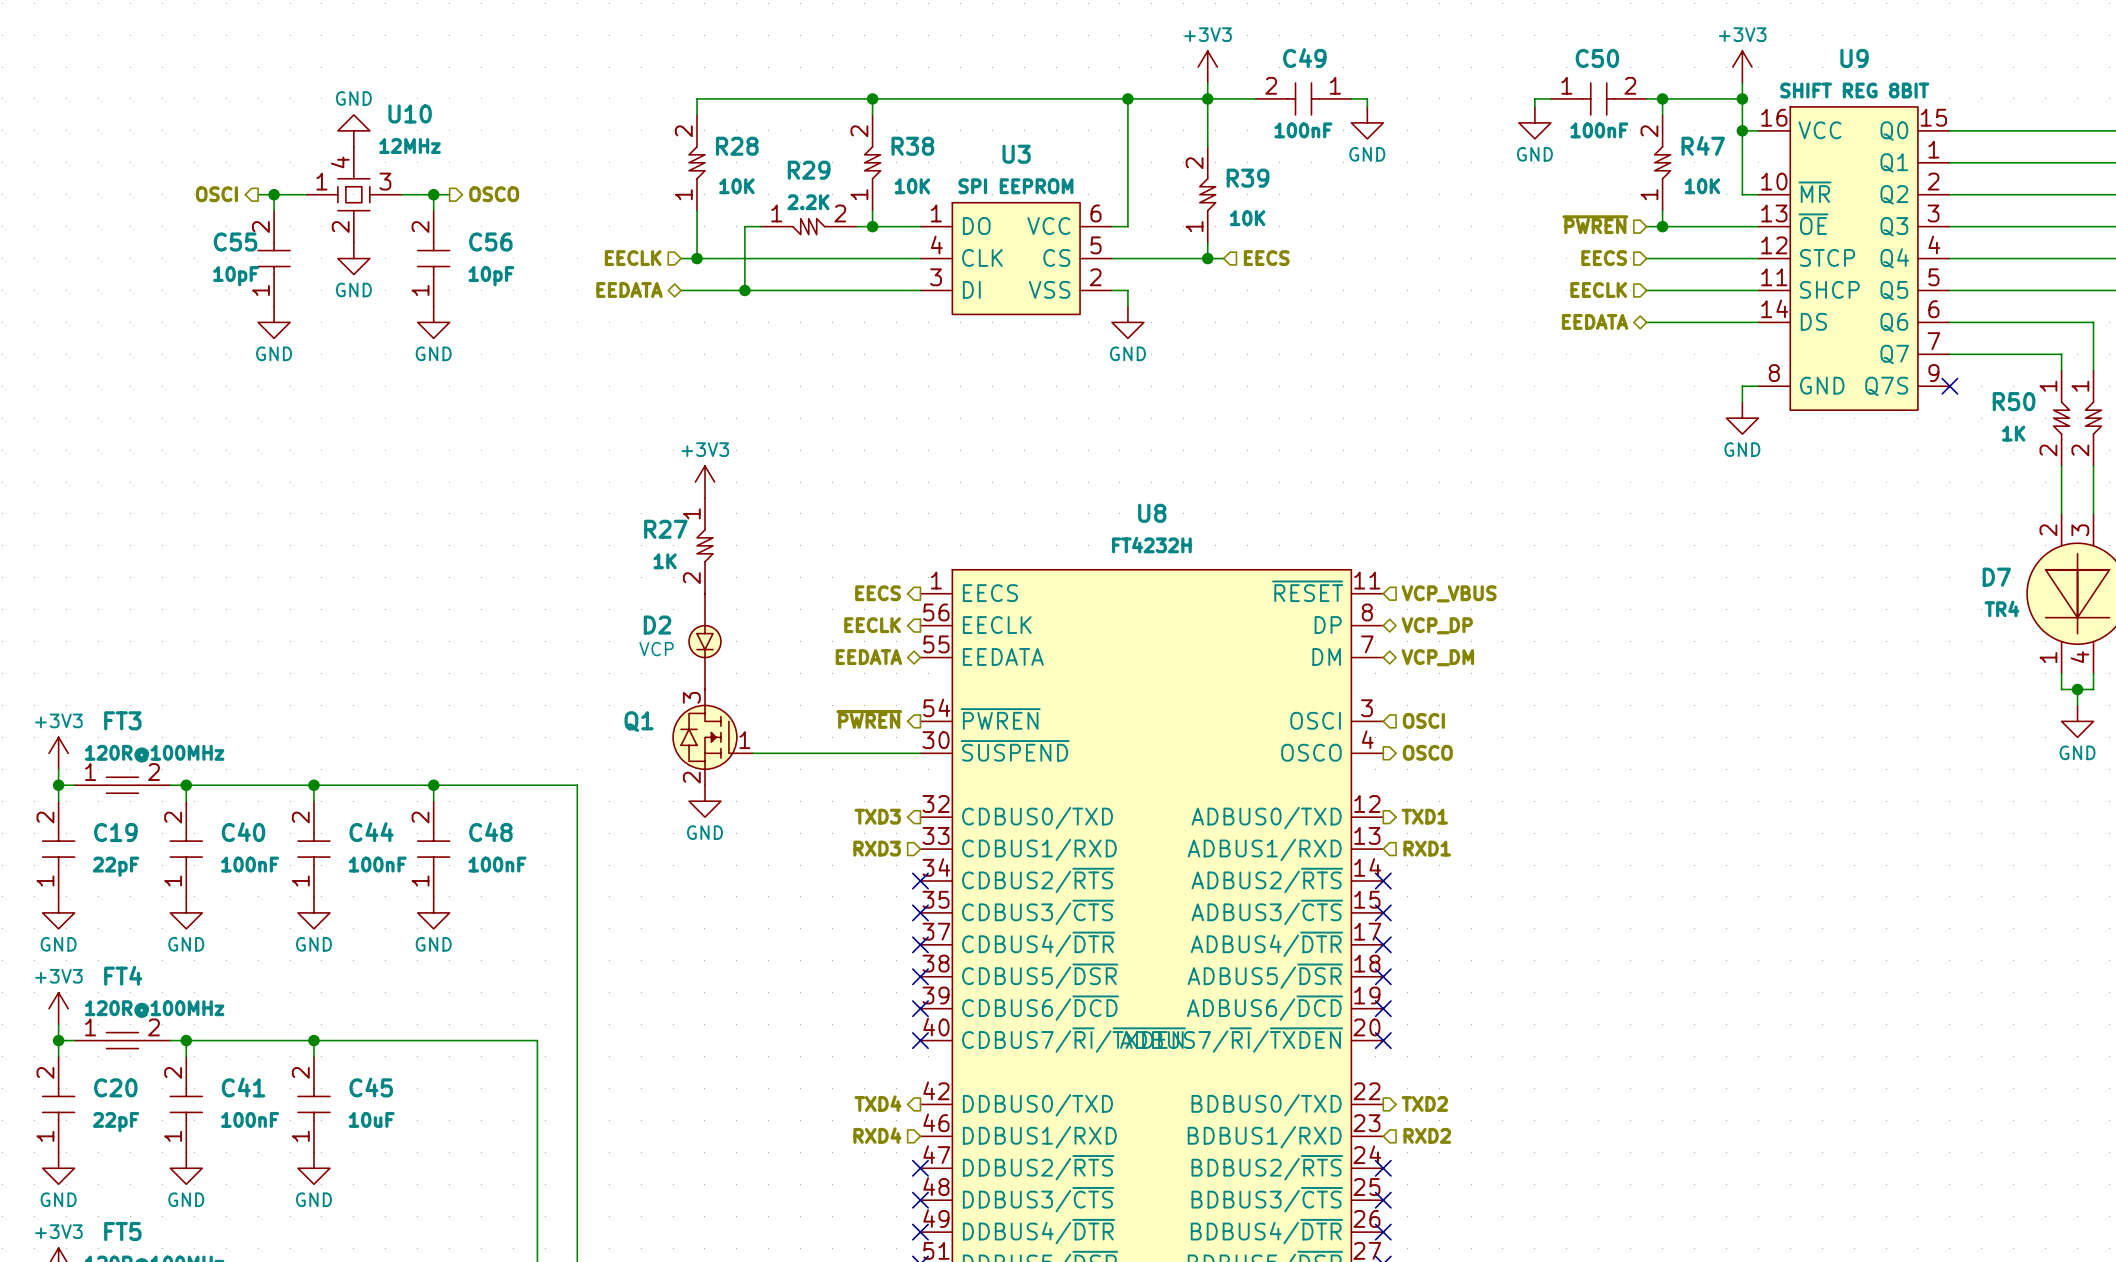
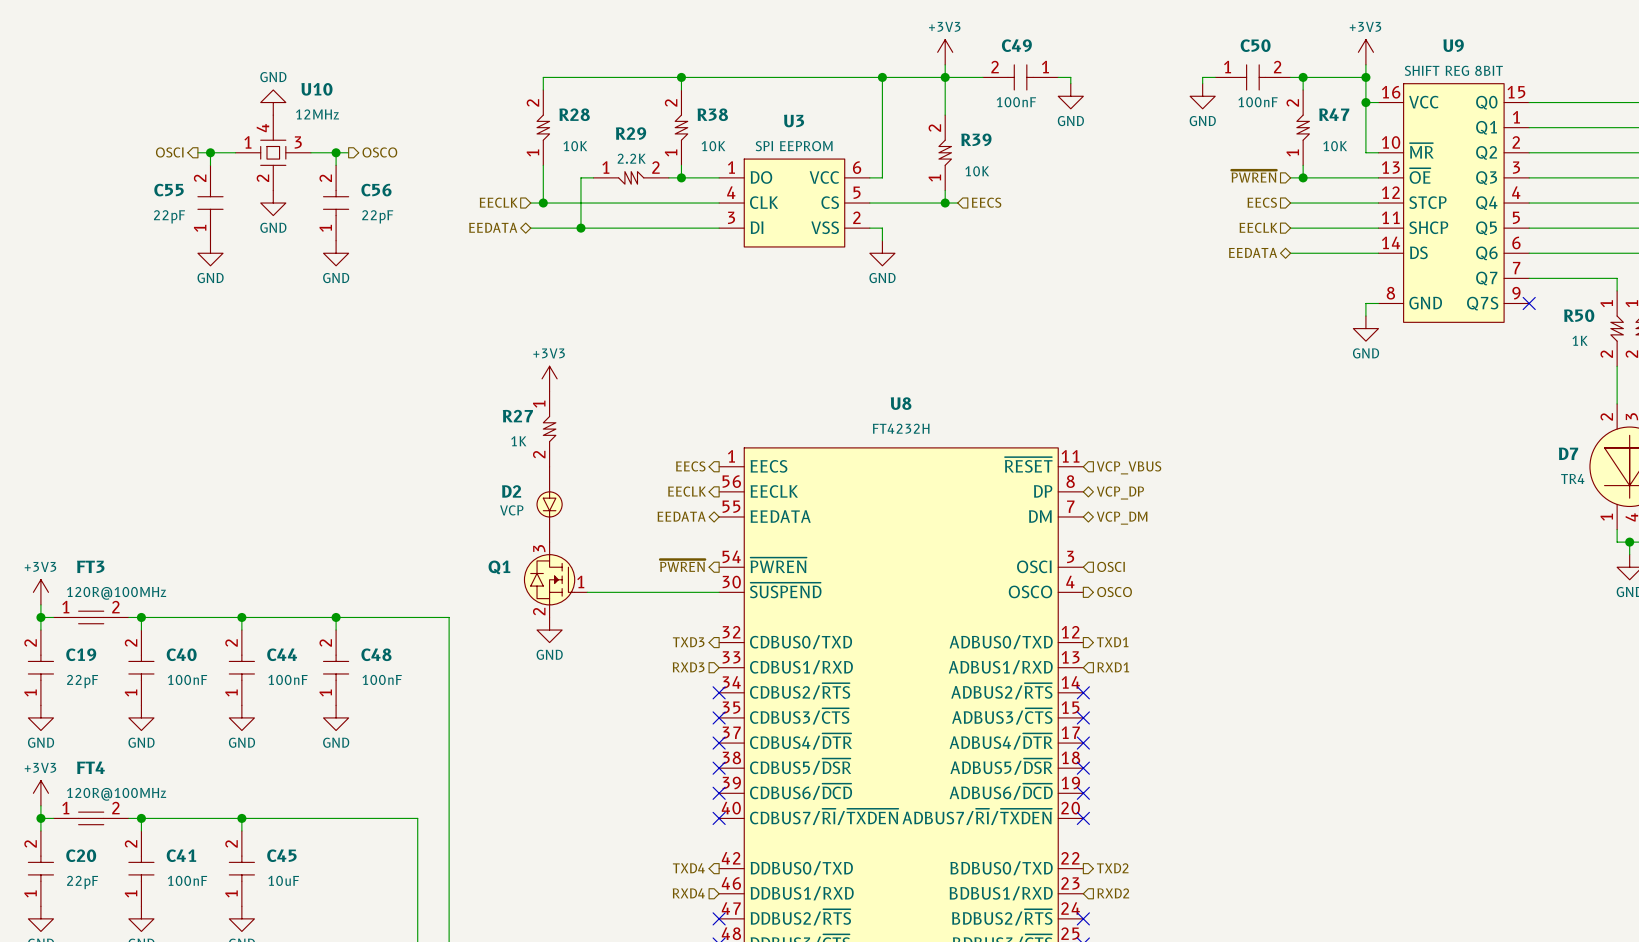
C55 name position: C55 (235, 242) -> C55 (169, 190)
C55 value: 10pF (236, 276) -> 22pF (169, 216)
C56 value: 10pF (491, 276) -> 22pF (377, 216)

